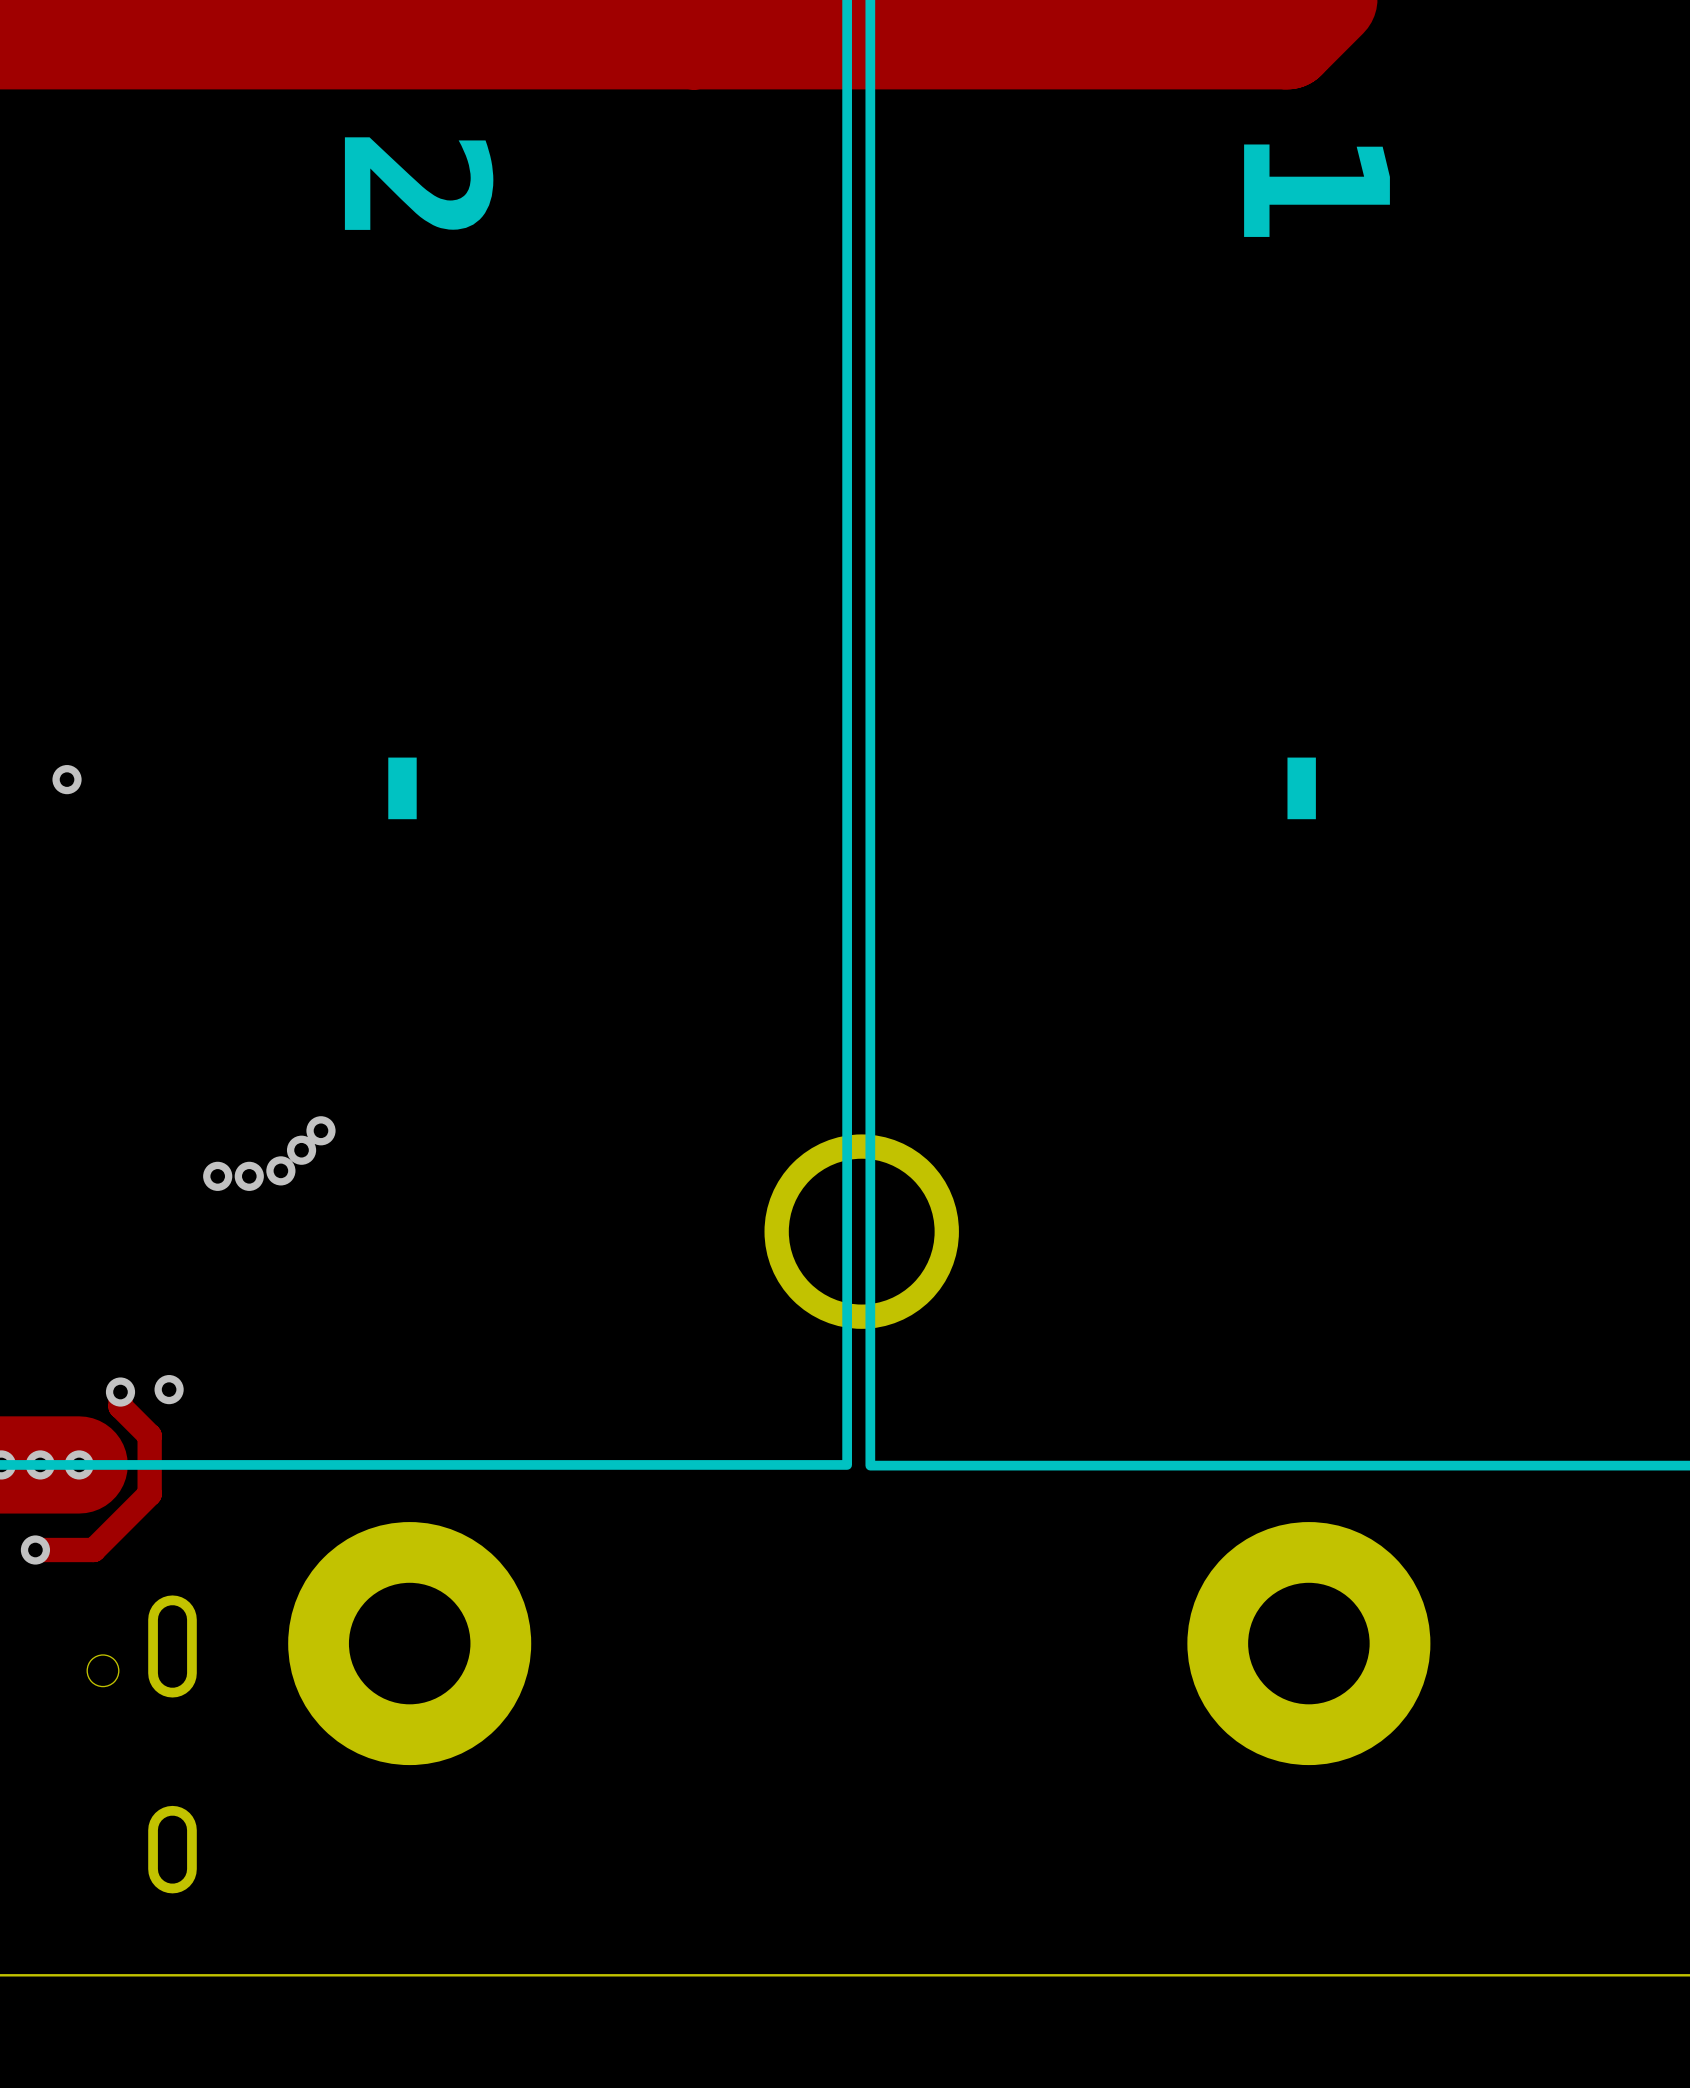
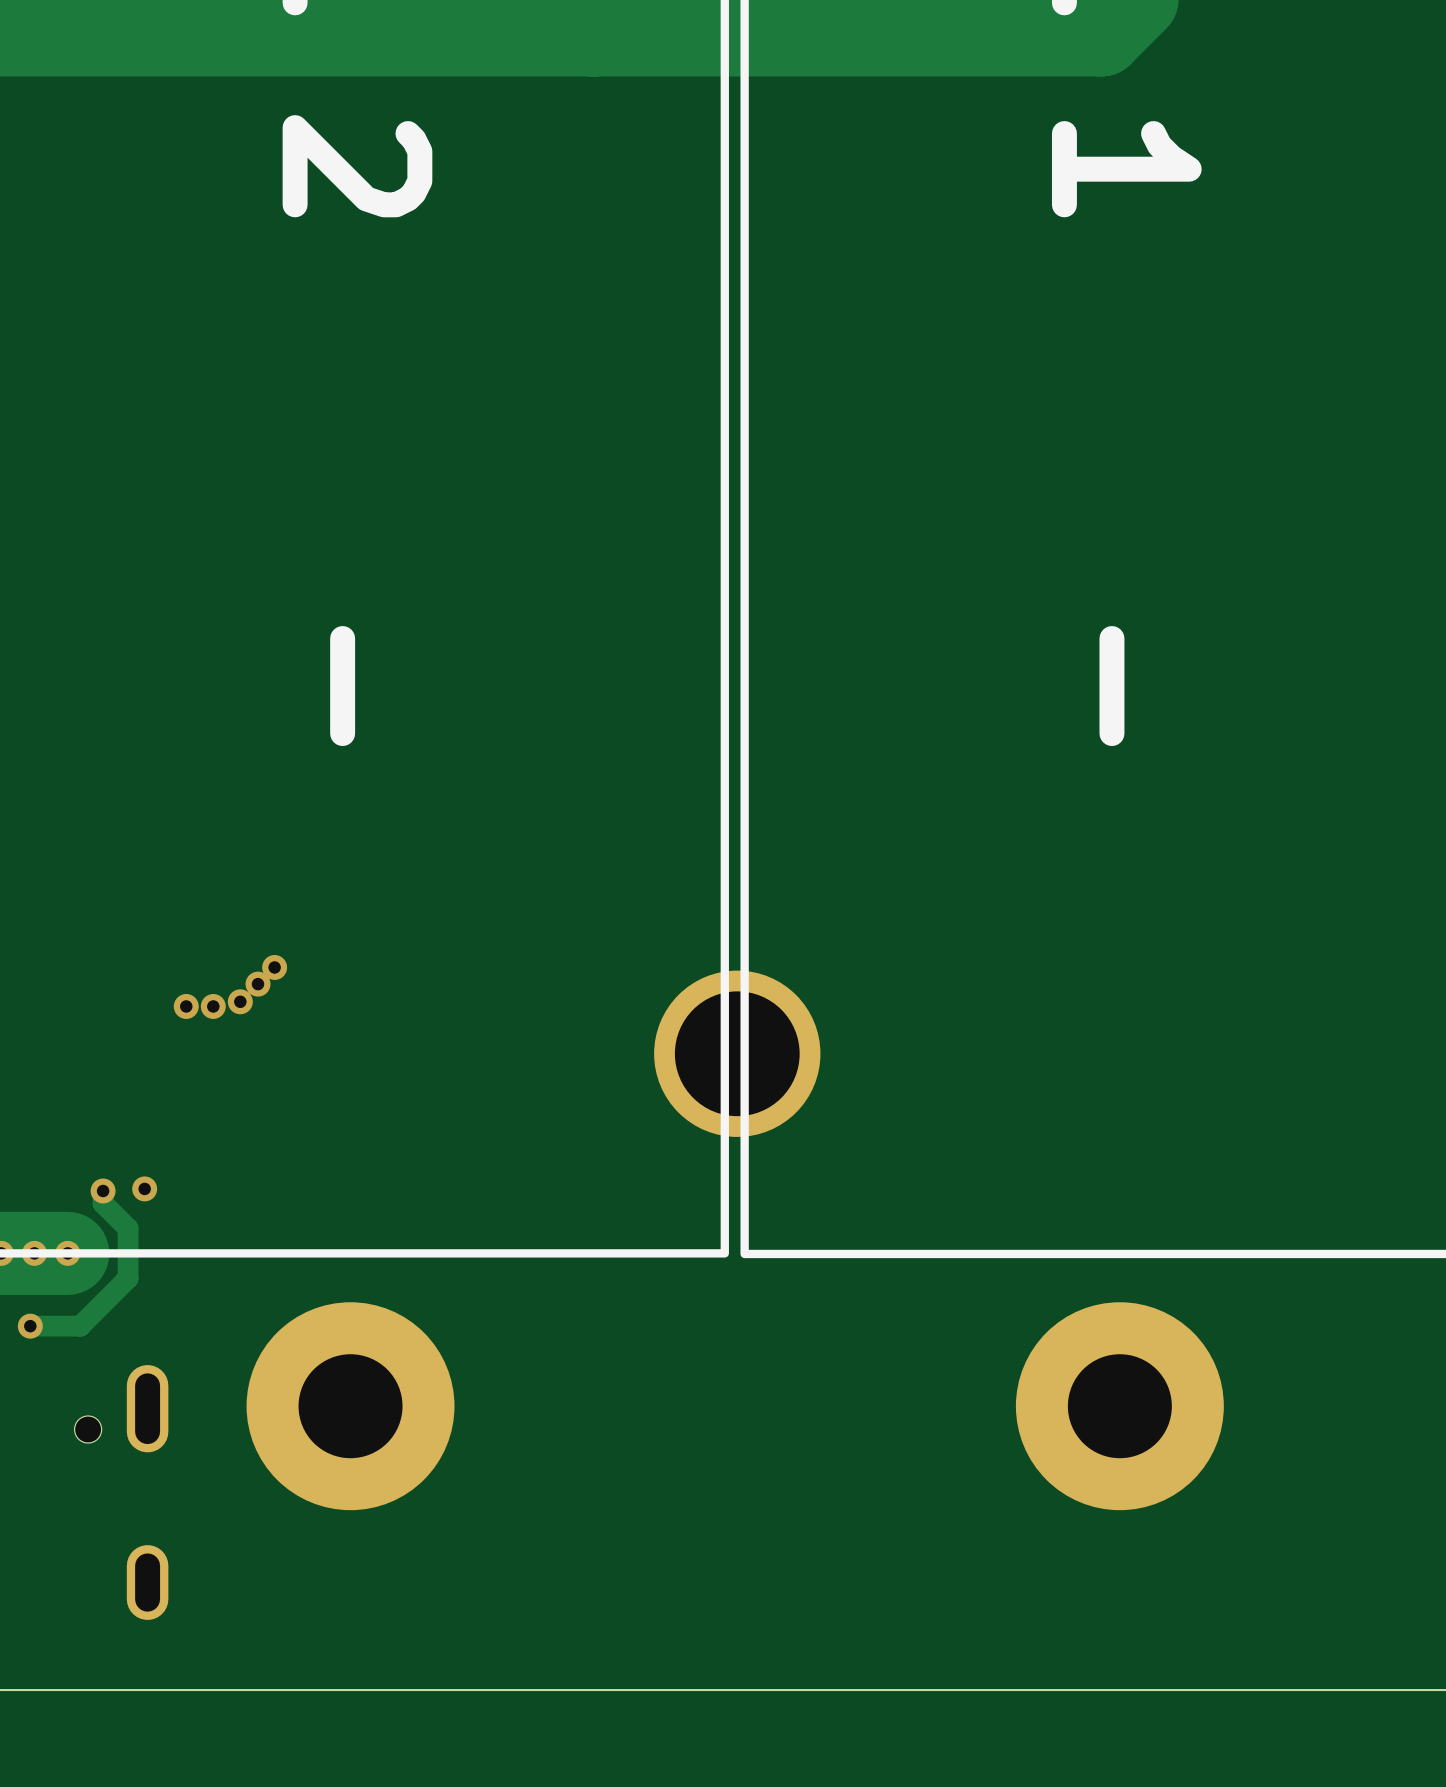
via: (67, 779) -> none

